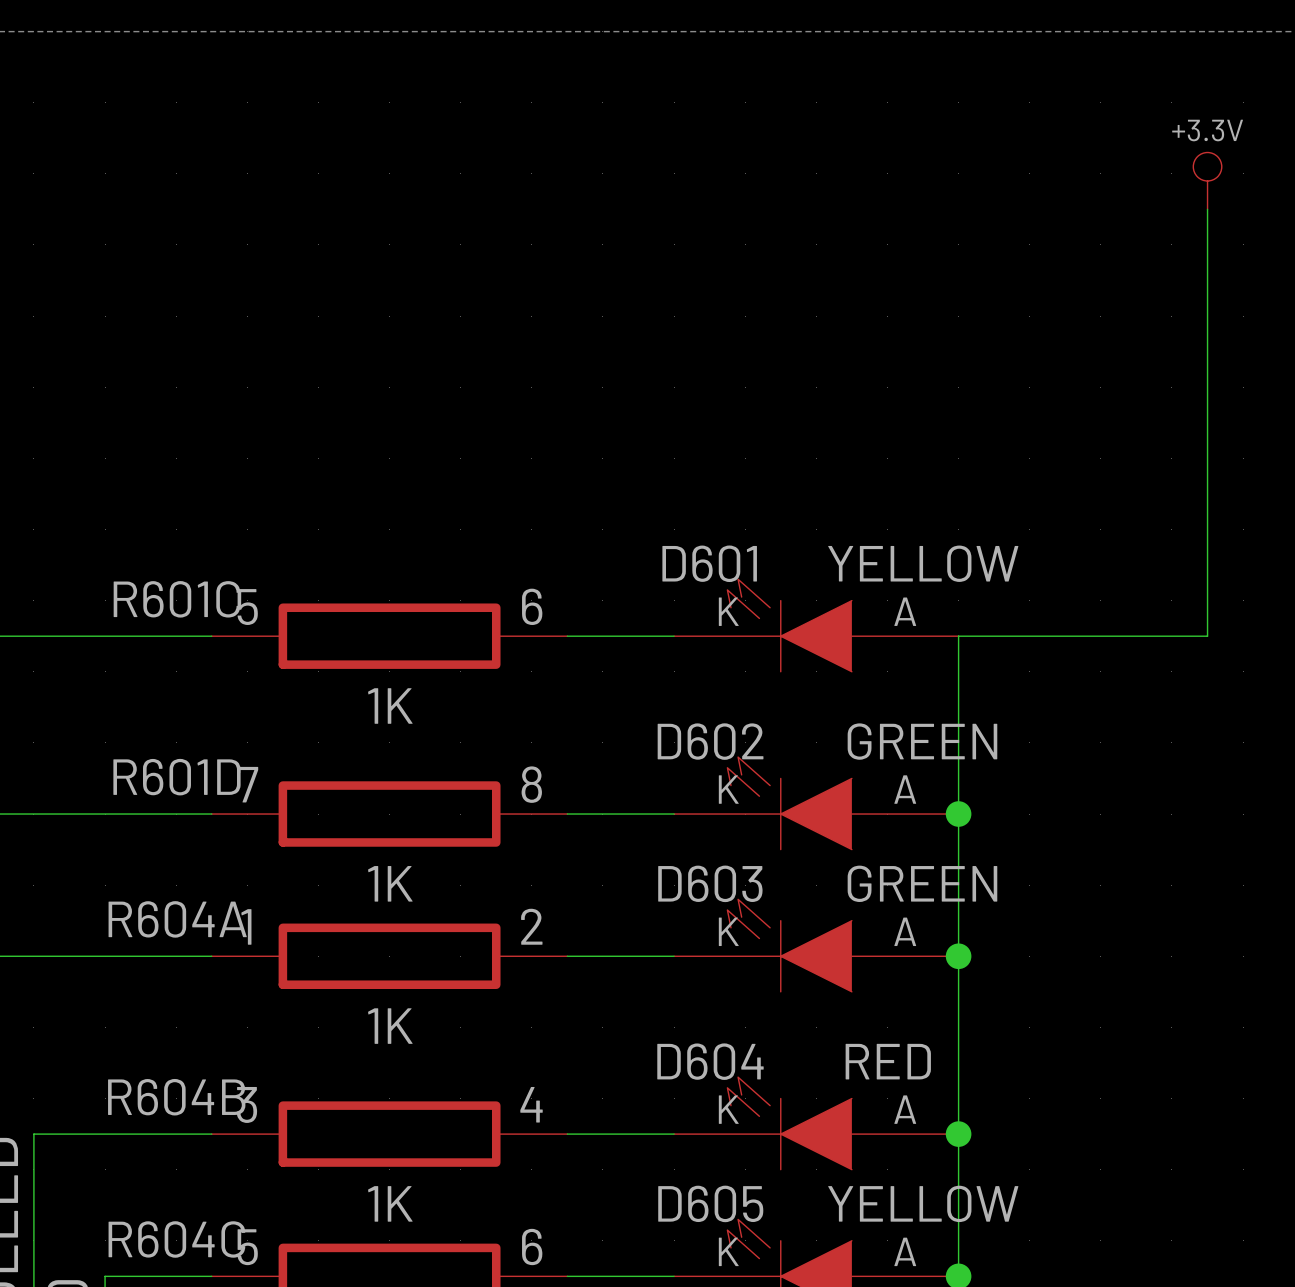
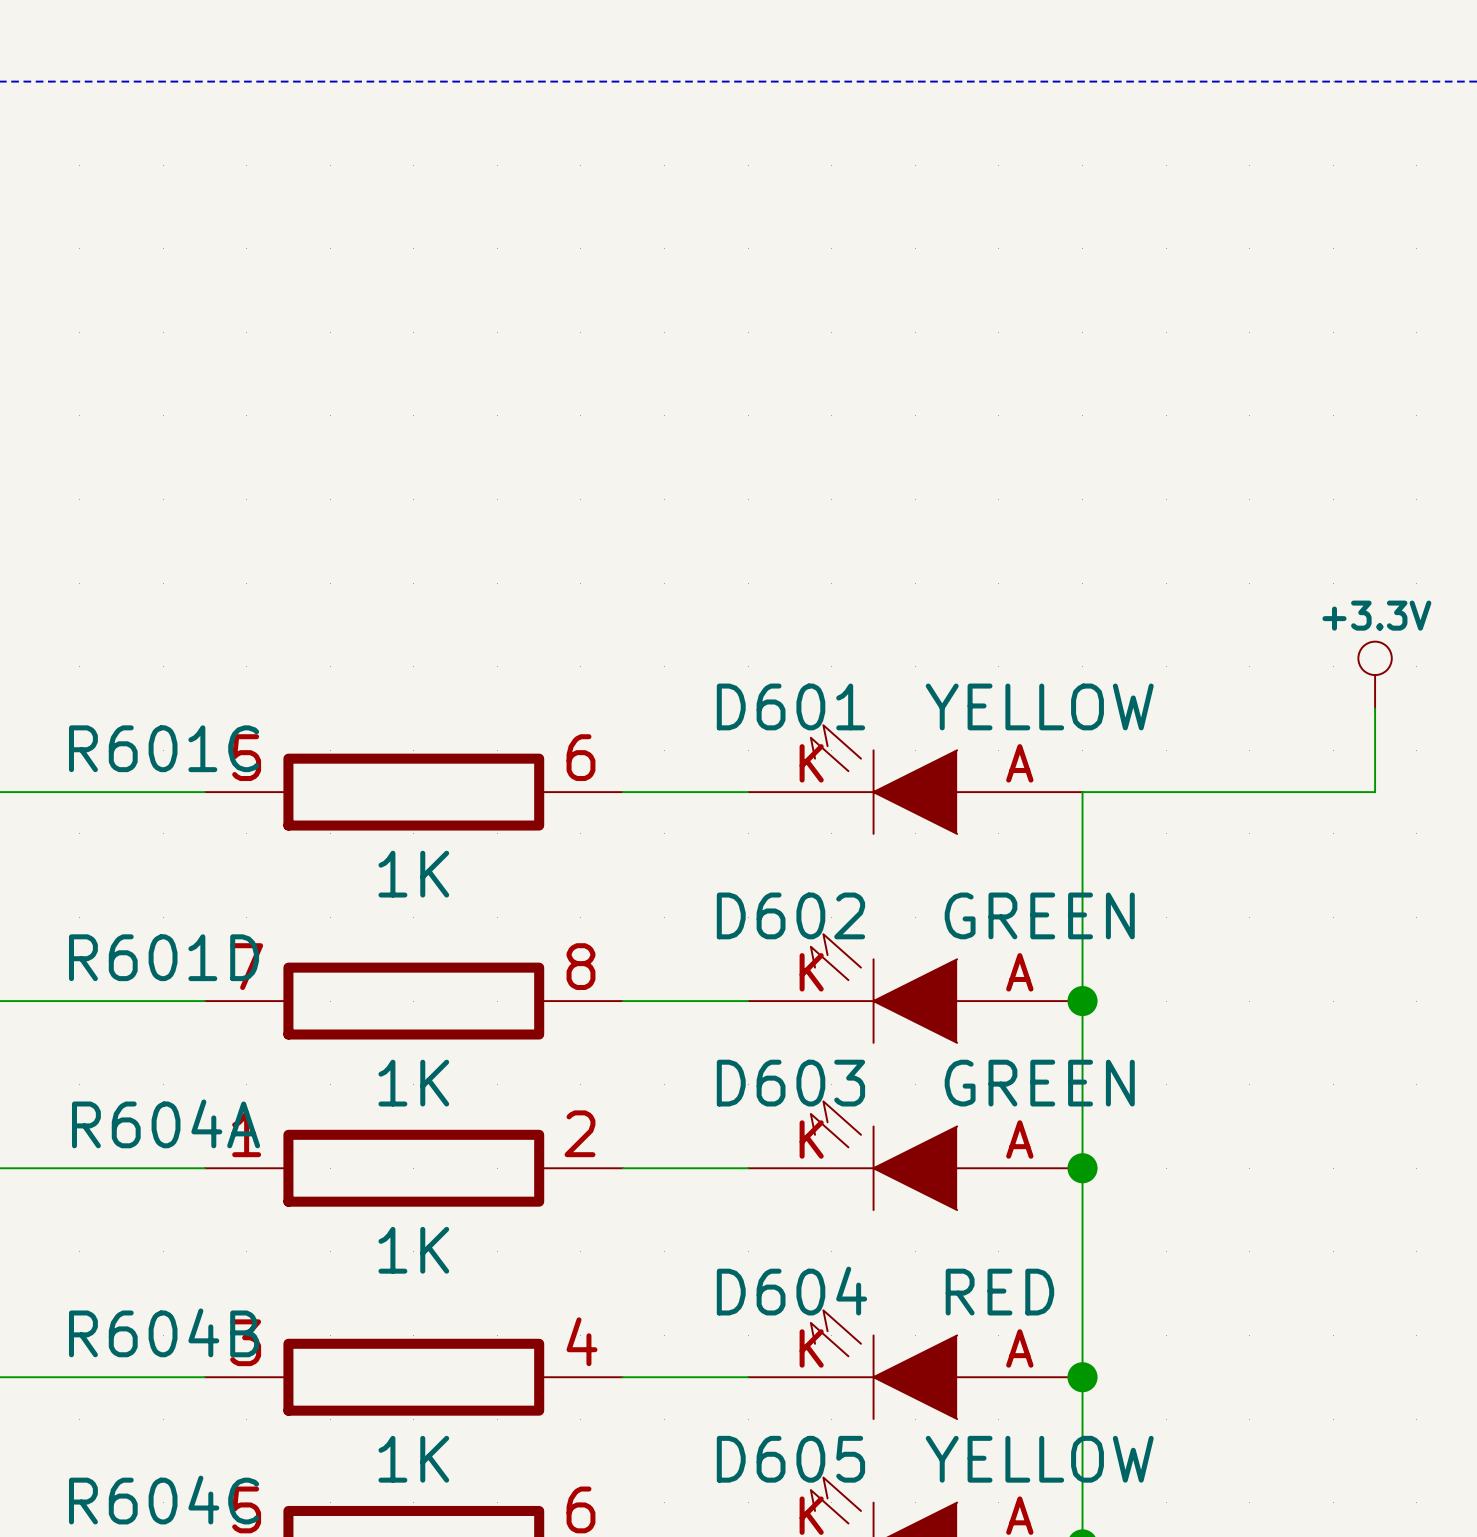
power symbol position: +3.3V (1207, 180) -> +3.3V (1375, 675)
wire: (1207, 209) (1207, 565) -> none

